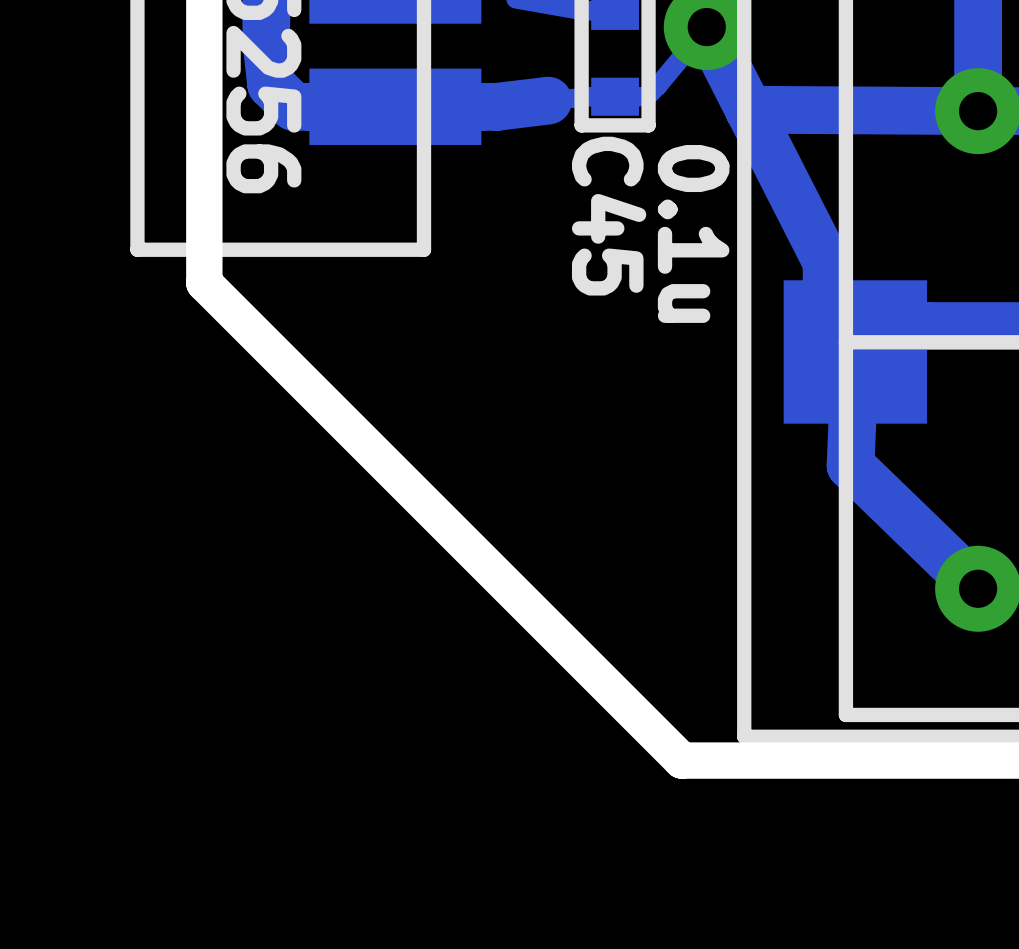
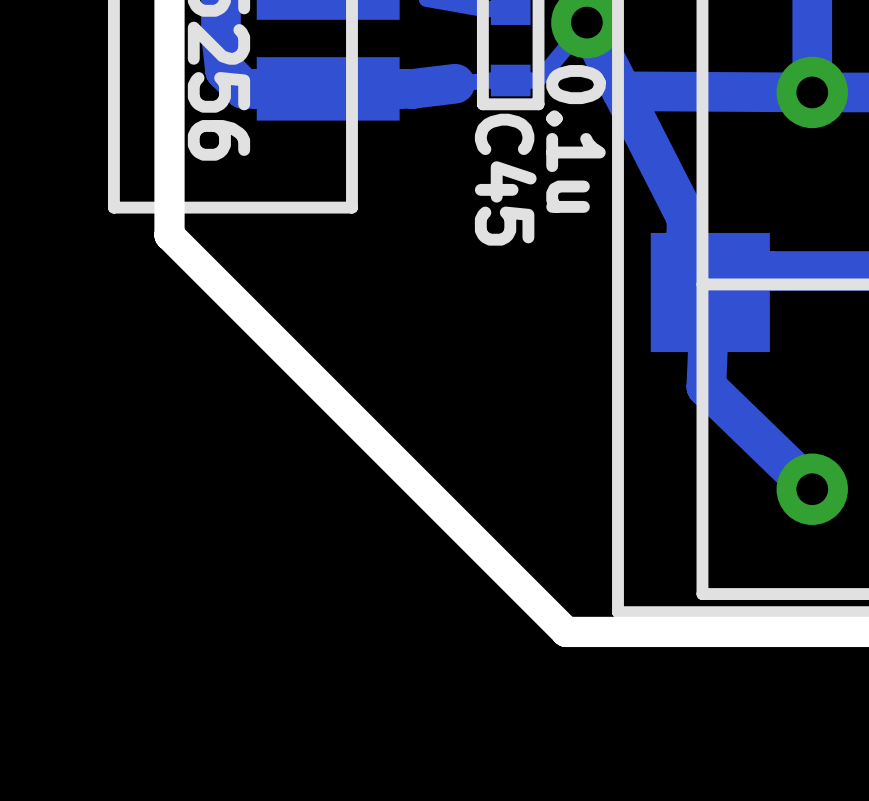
C45 value position: 0.1u (693, 233) -> 0.1u (575, 138)

